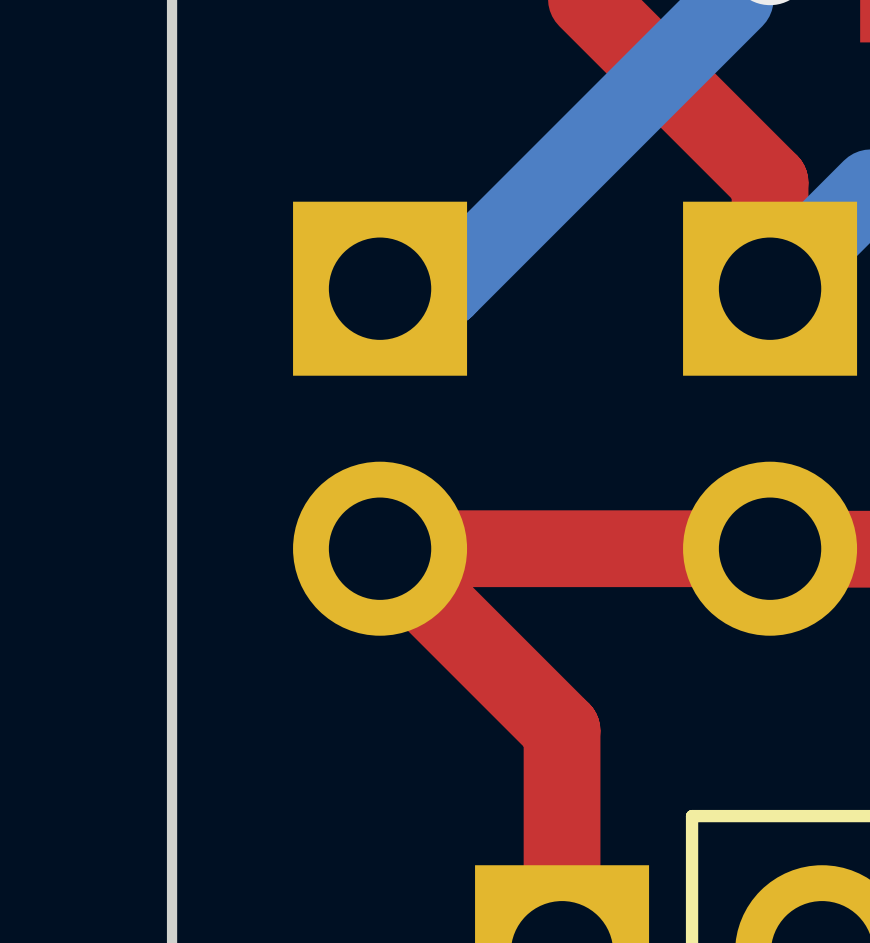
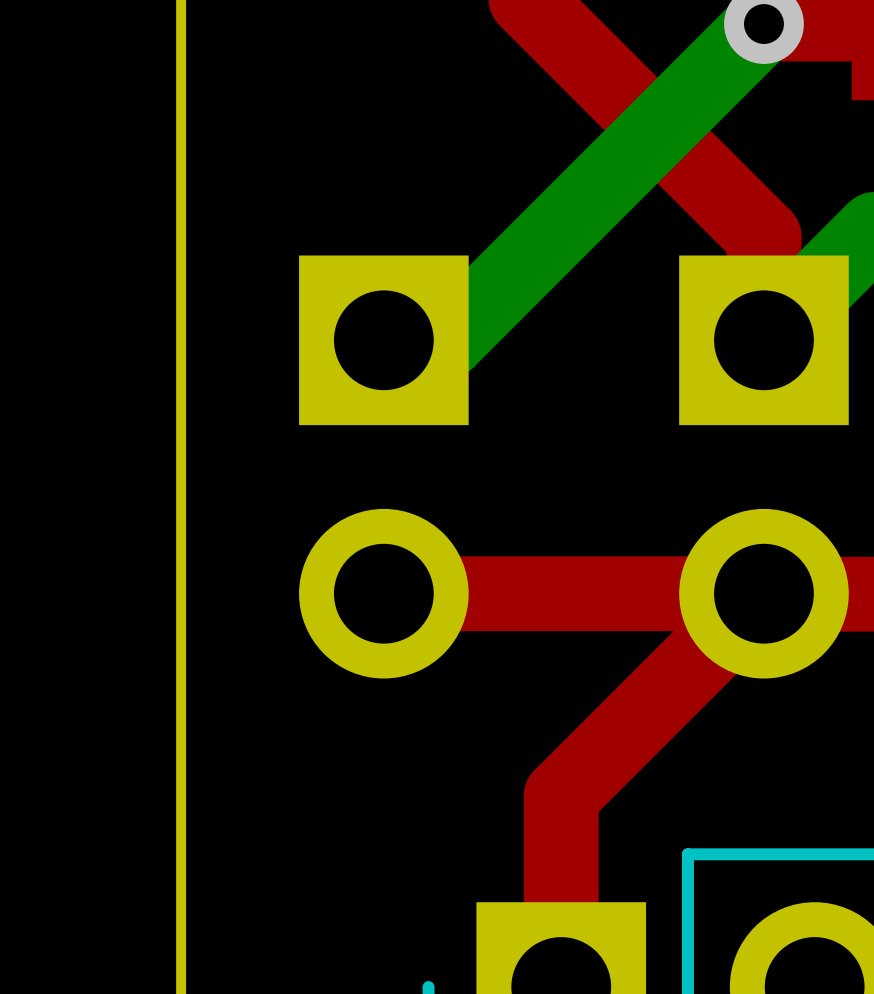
top track: (380, 548) (562, 730) (562, 756) -> (763, 593) (561, 796)

